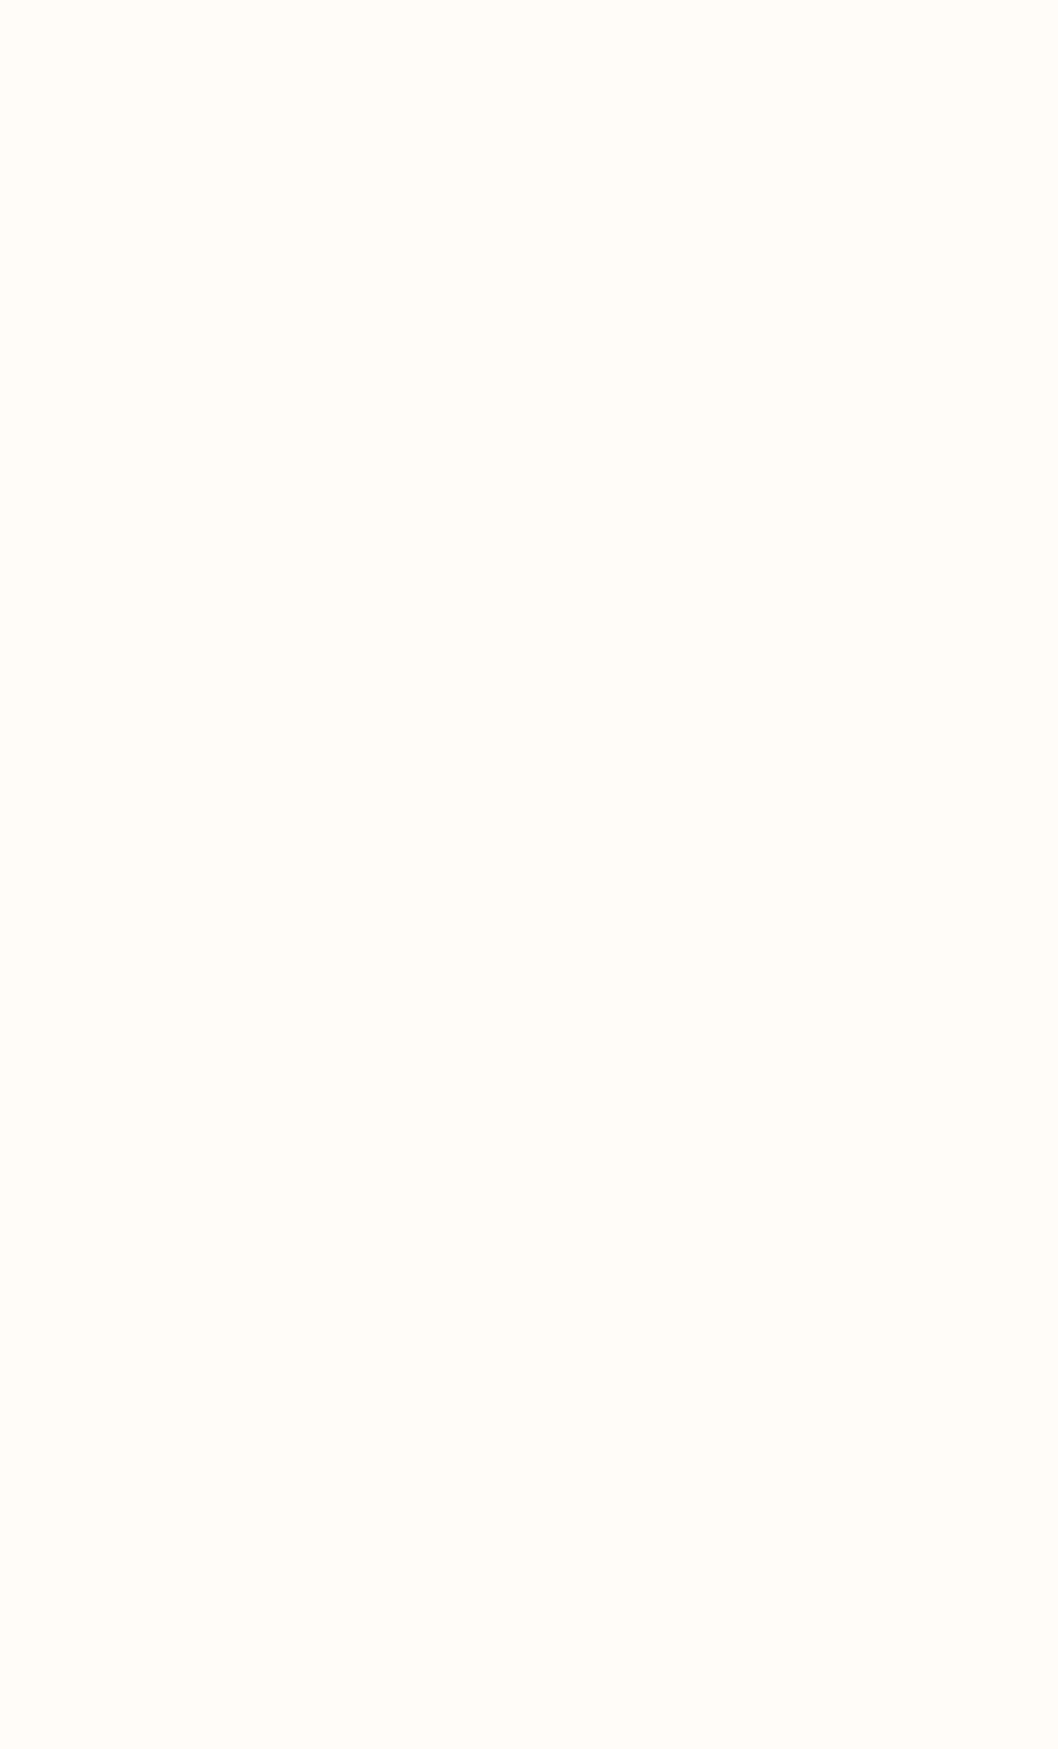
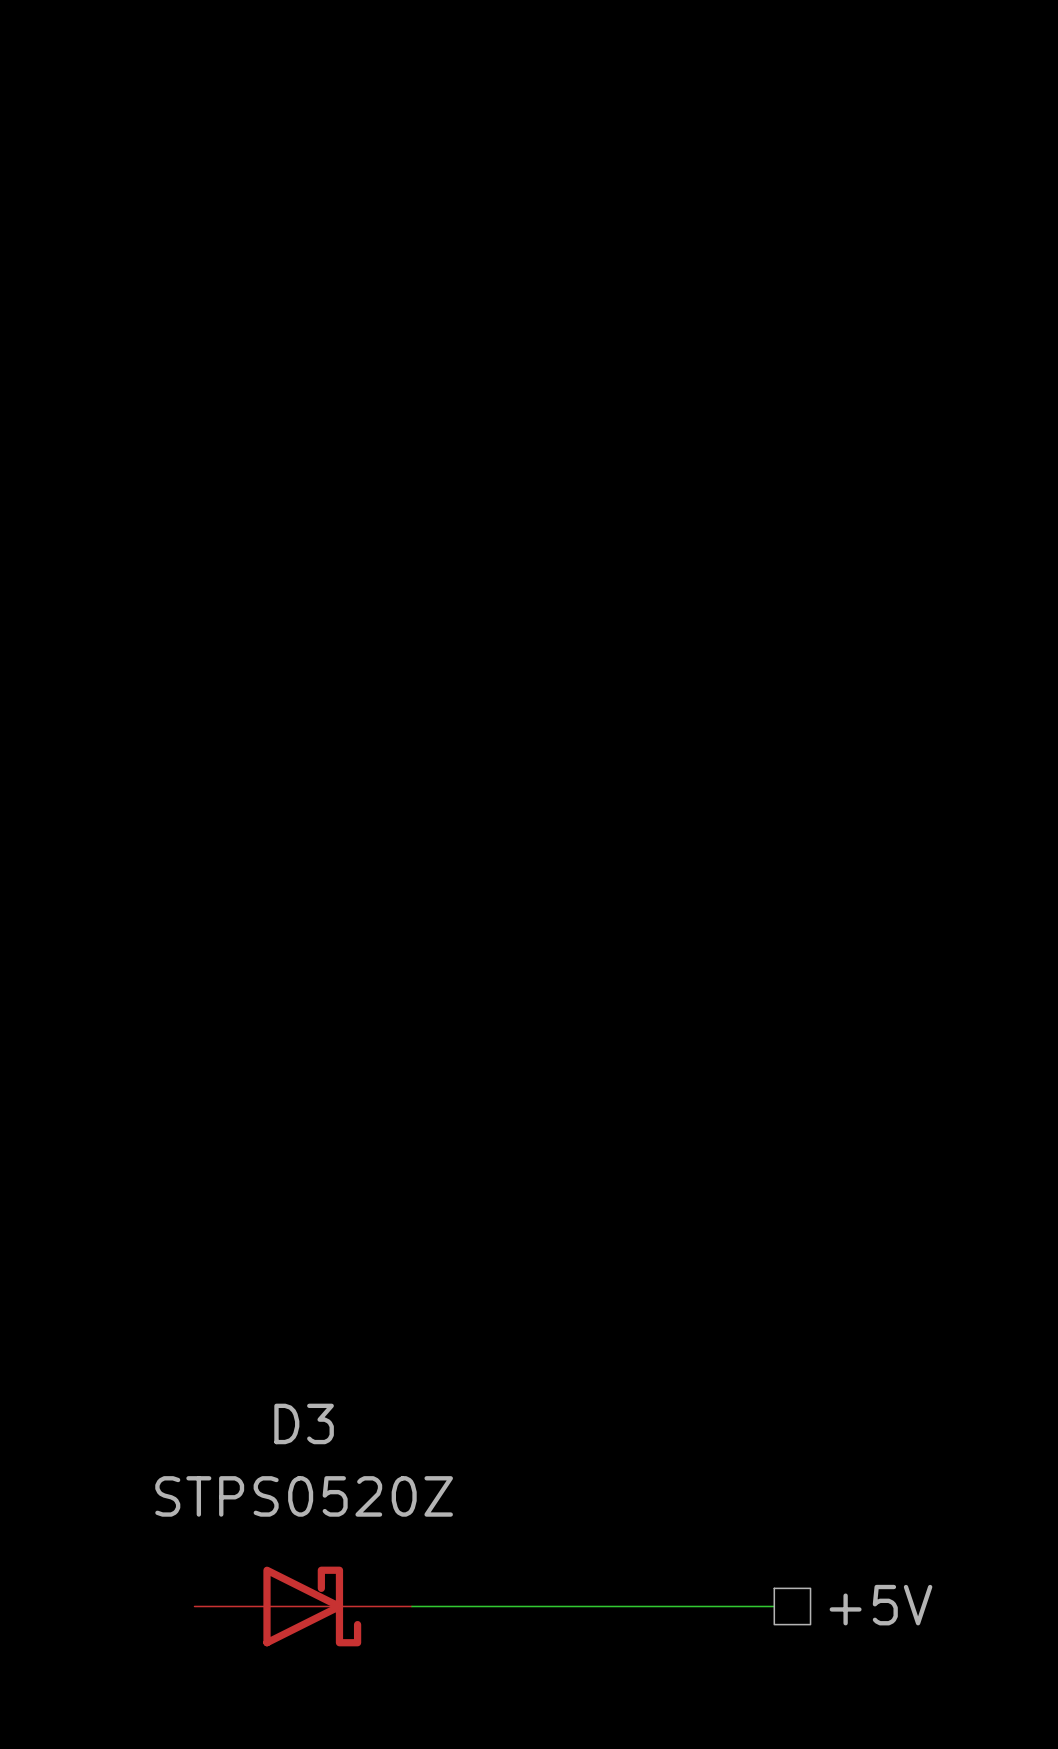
hierarchical label: none -> +5V (880, 1605)
D3: none -> STPS0520Z (303, 1606)
wire: none -> (411, 1606) (774, 1606)

